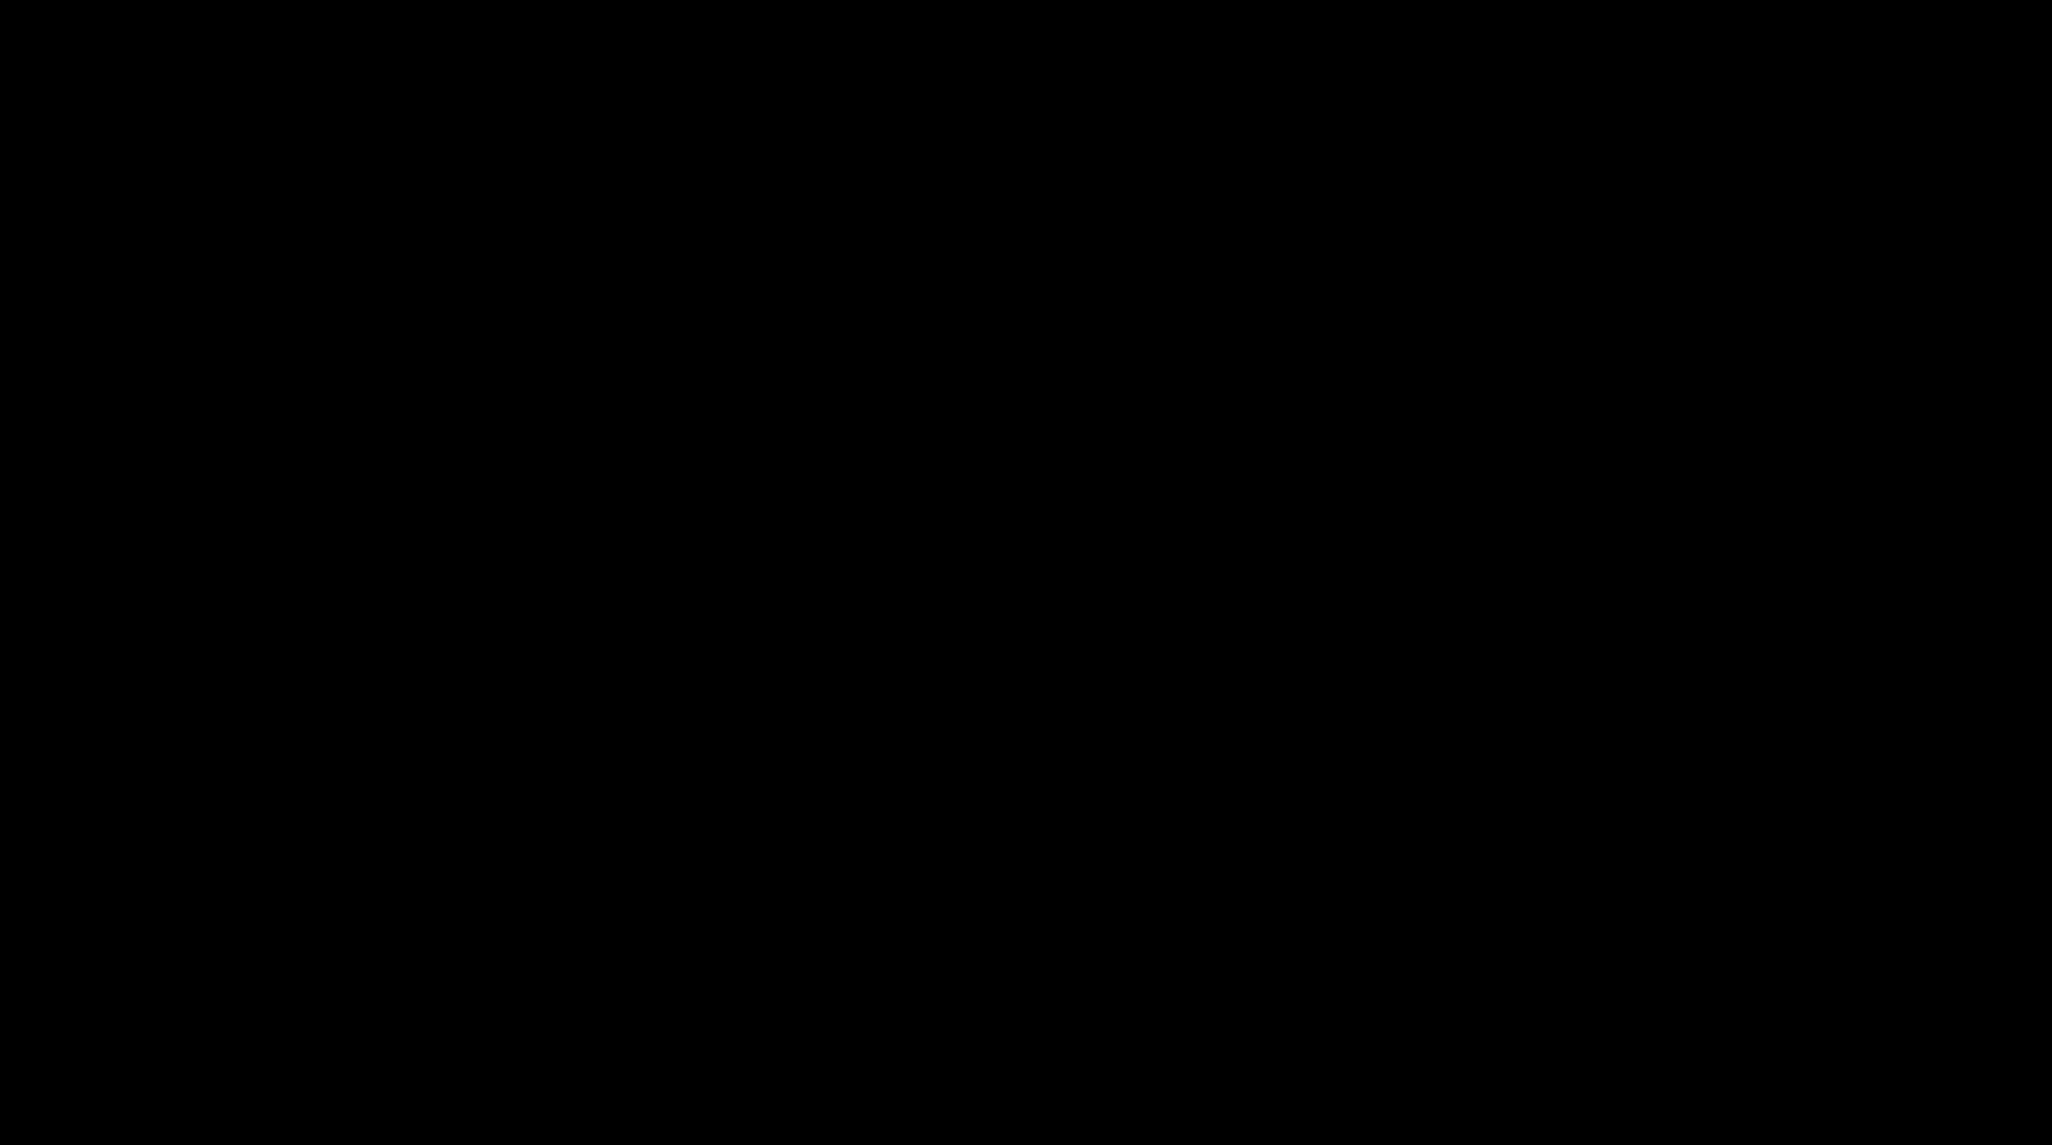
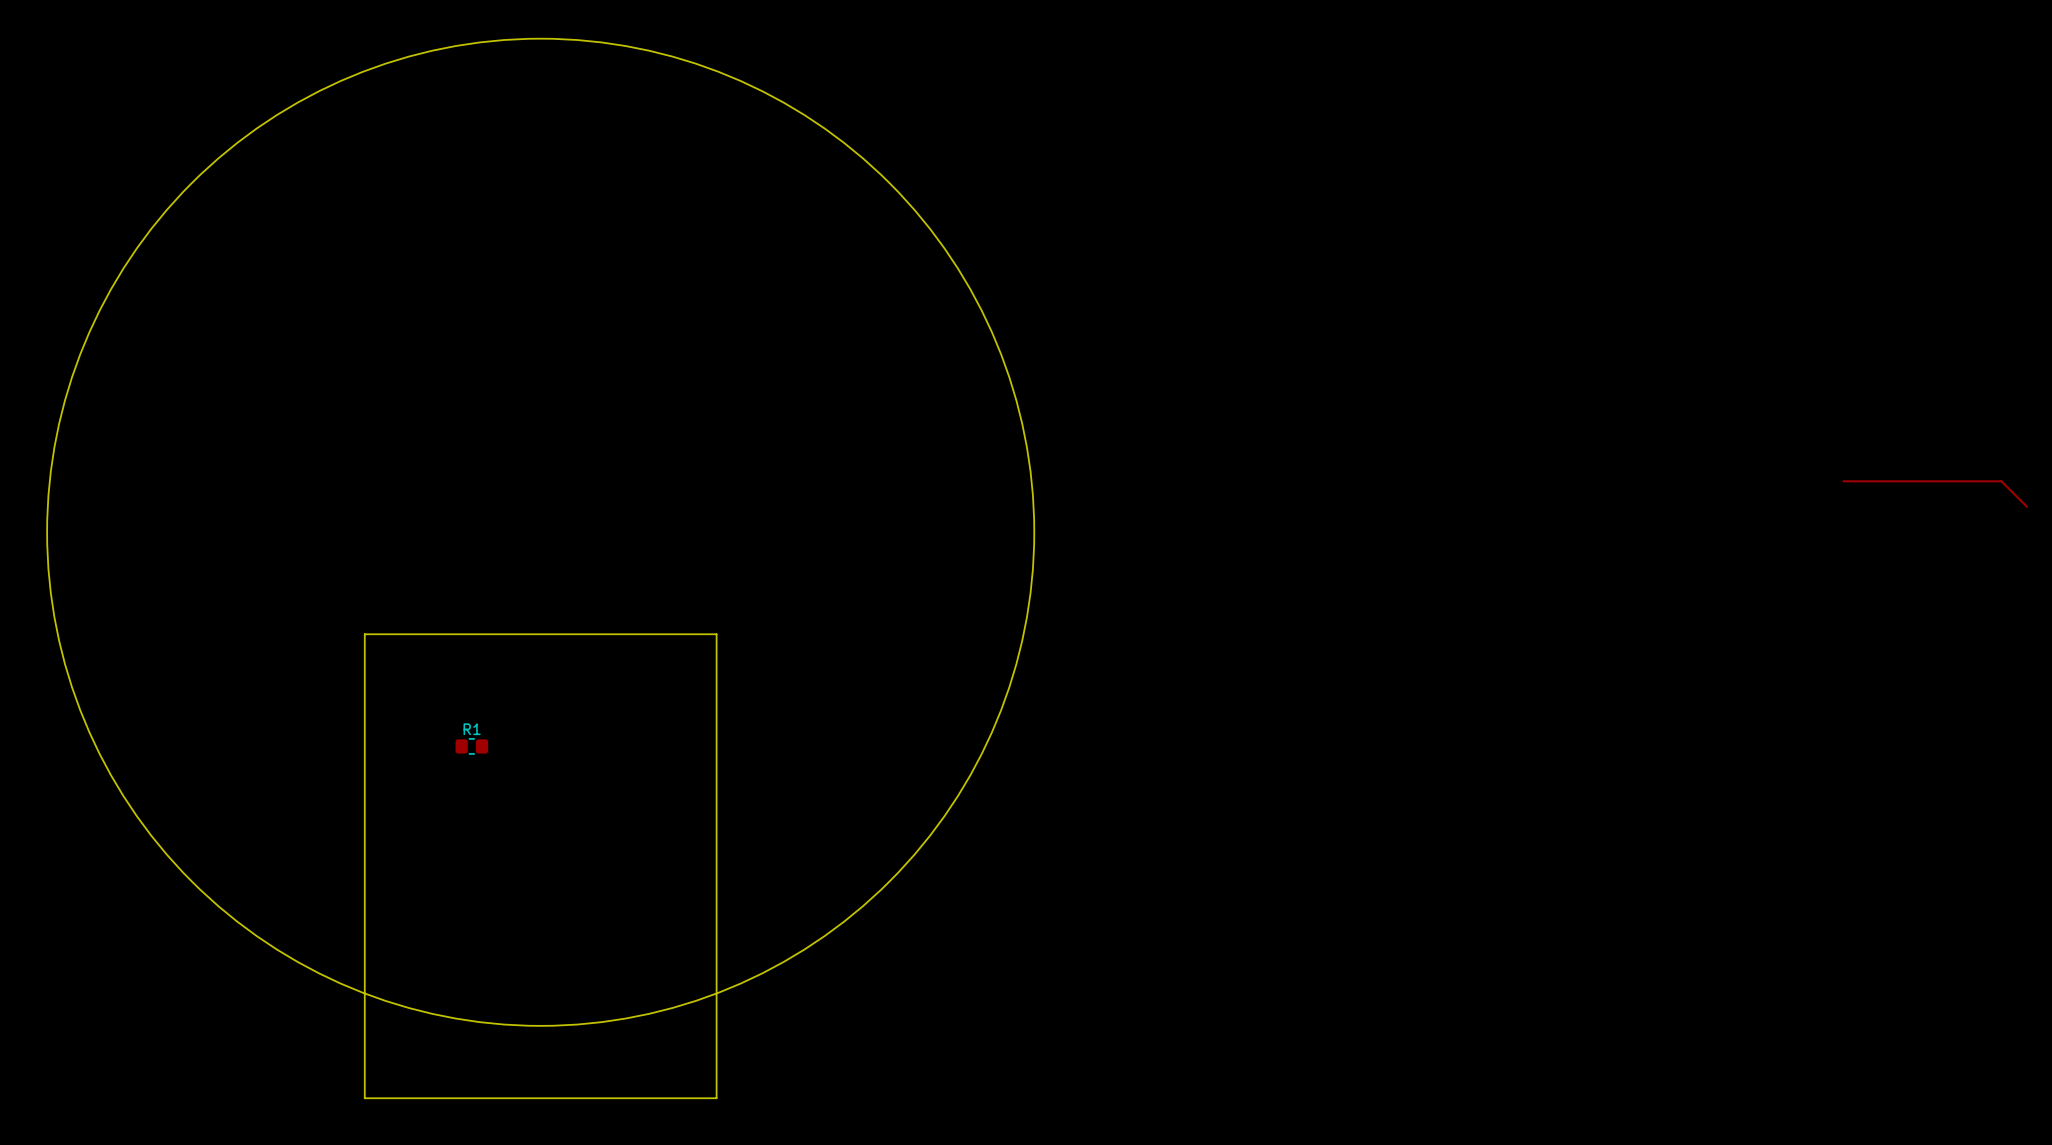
round board edge: none -> [46, 38, 1035, 1027]
top track: none -> (1843, 481) (2001, 481) (2026, 506)
board edge: none -> (364, 634) (716, 634) (716, 1098) (364, 1098) (364, 634)
R1: none -> (471, 746)

